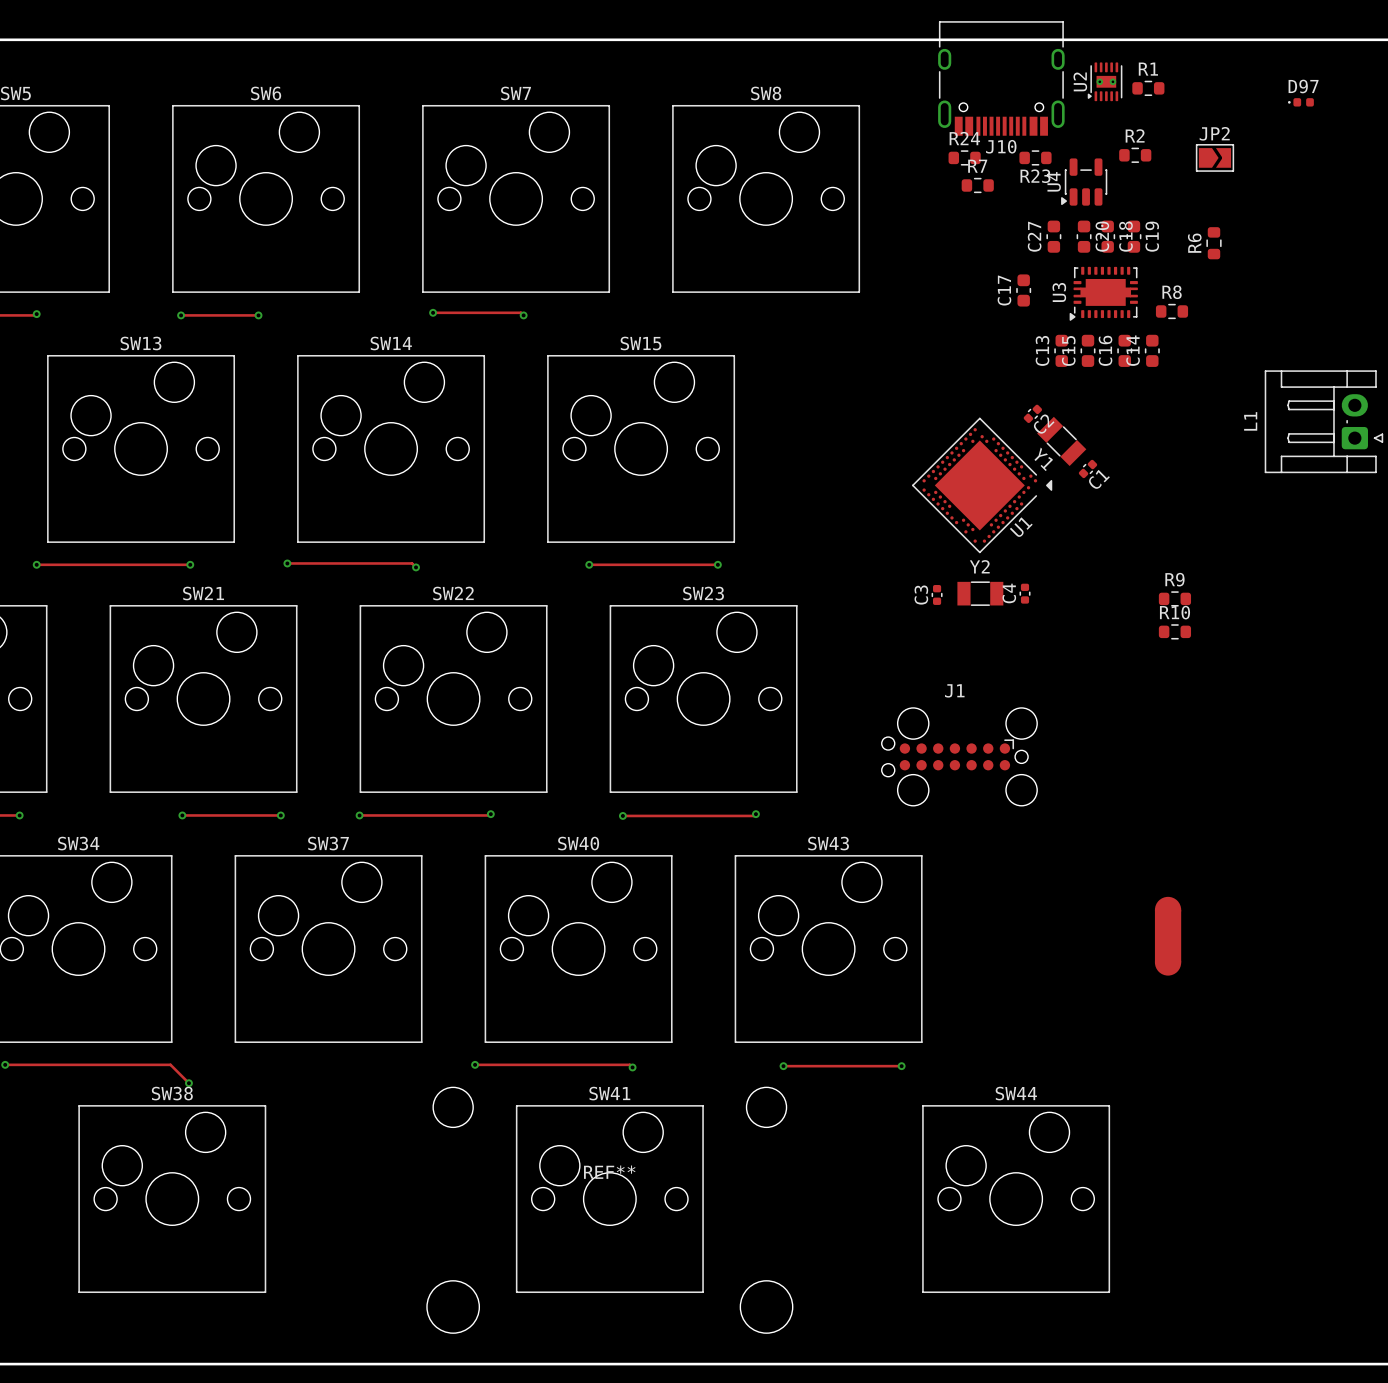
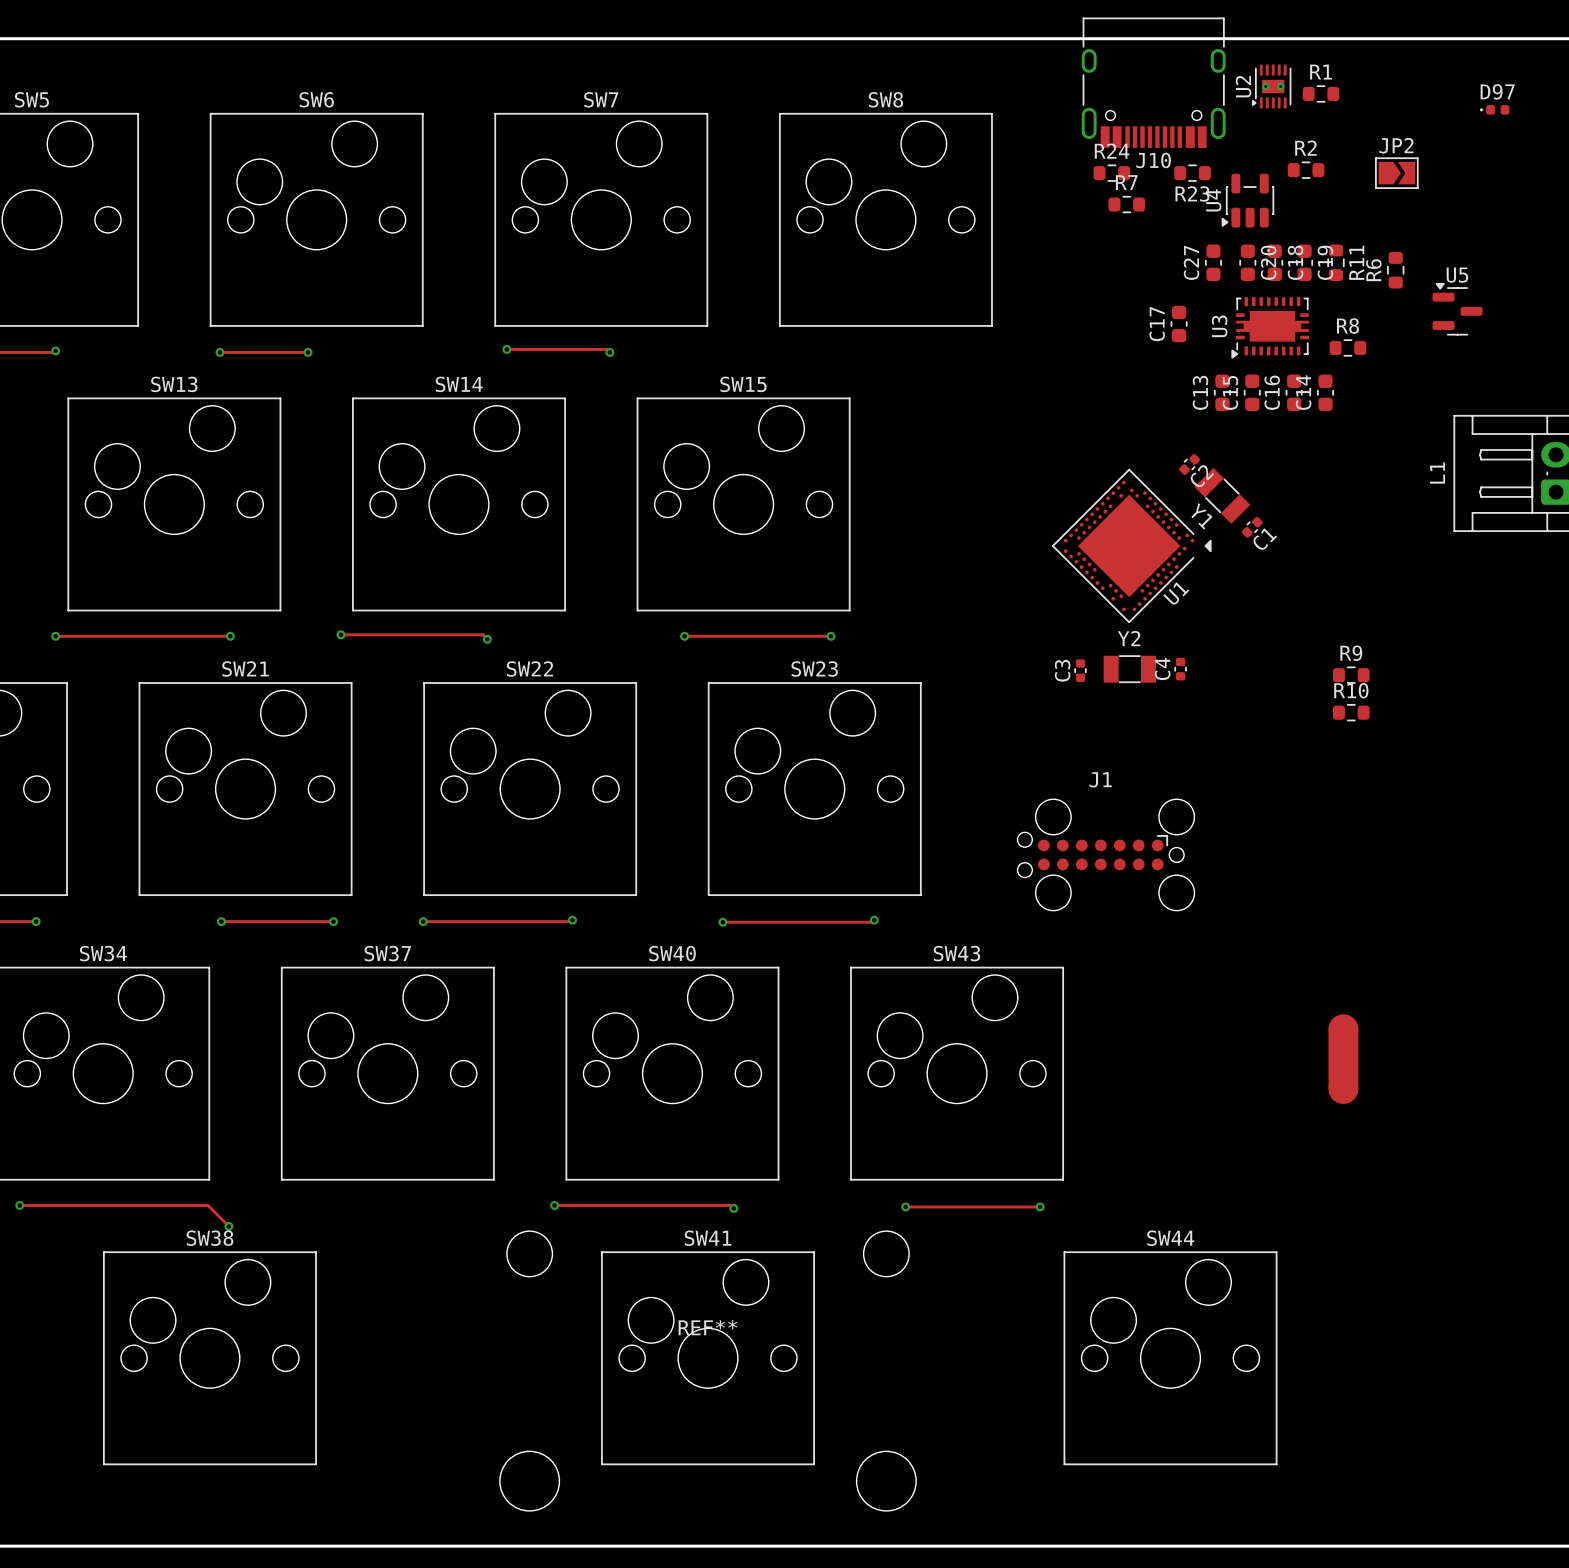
R11: none -> (1335, 262)
U5: none -> (1457, 309)

